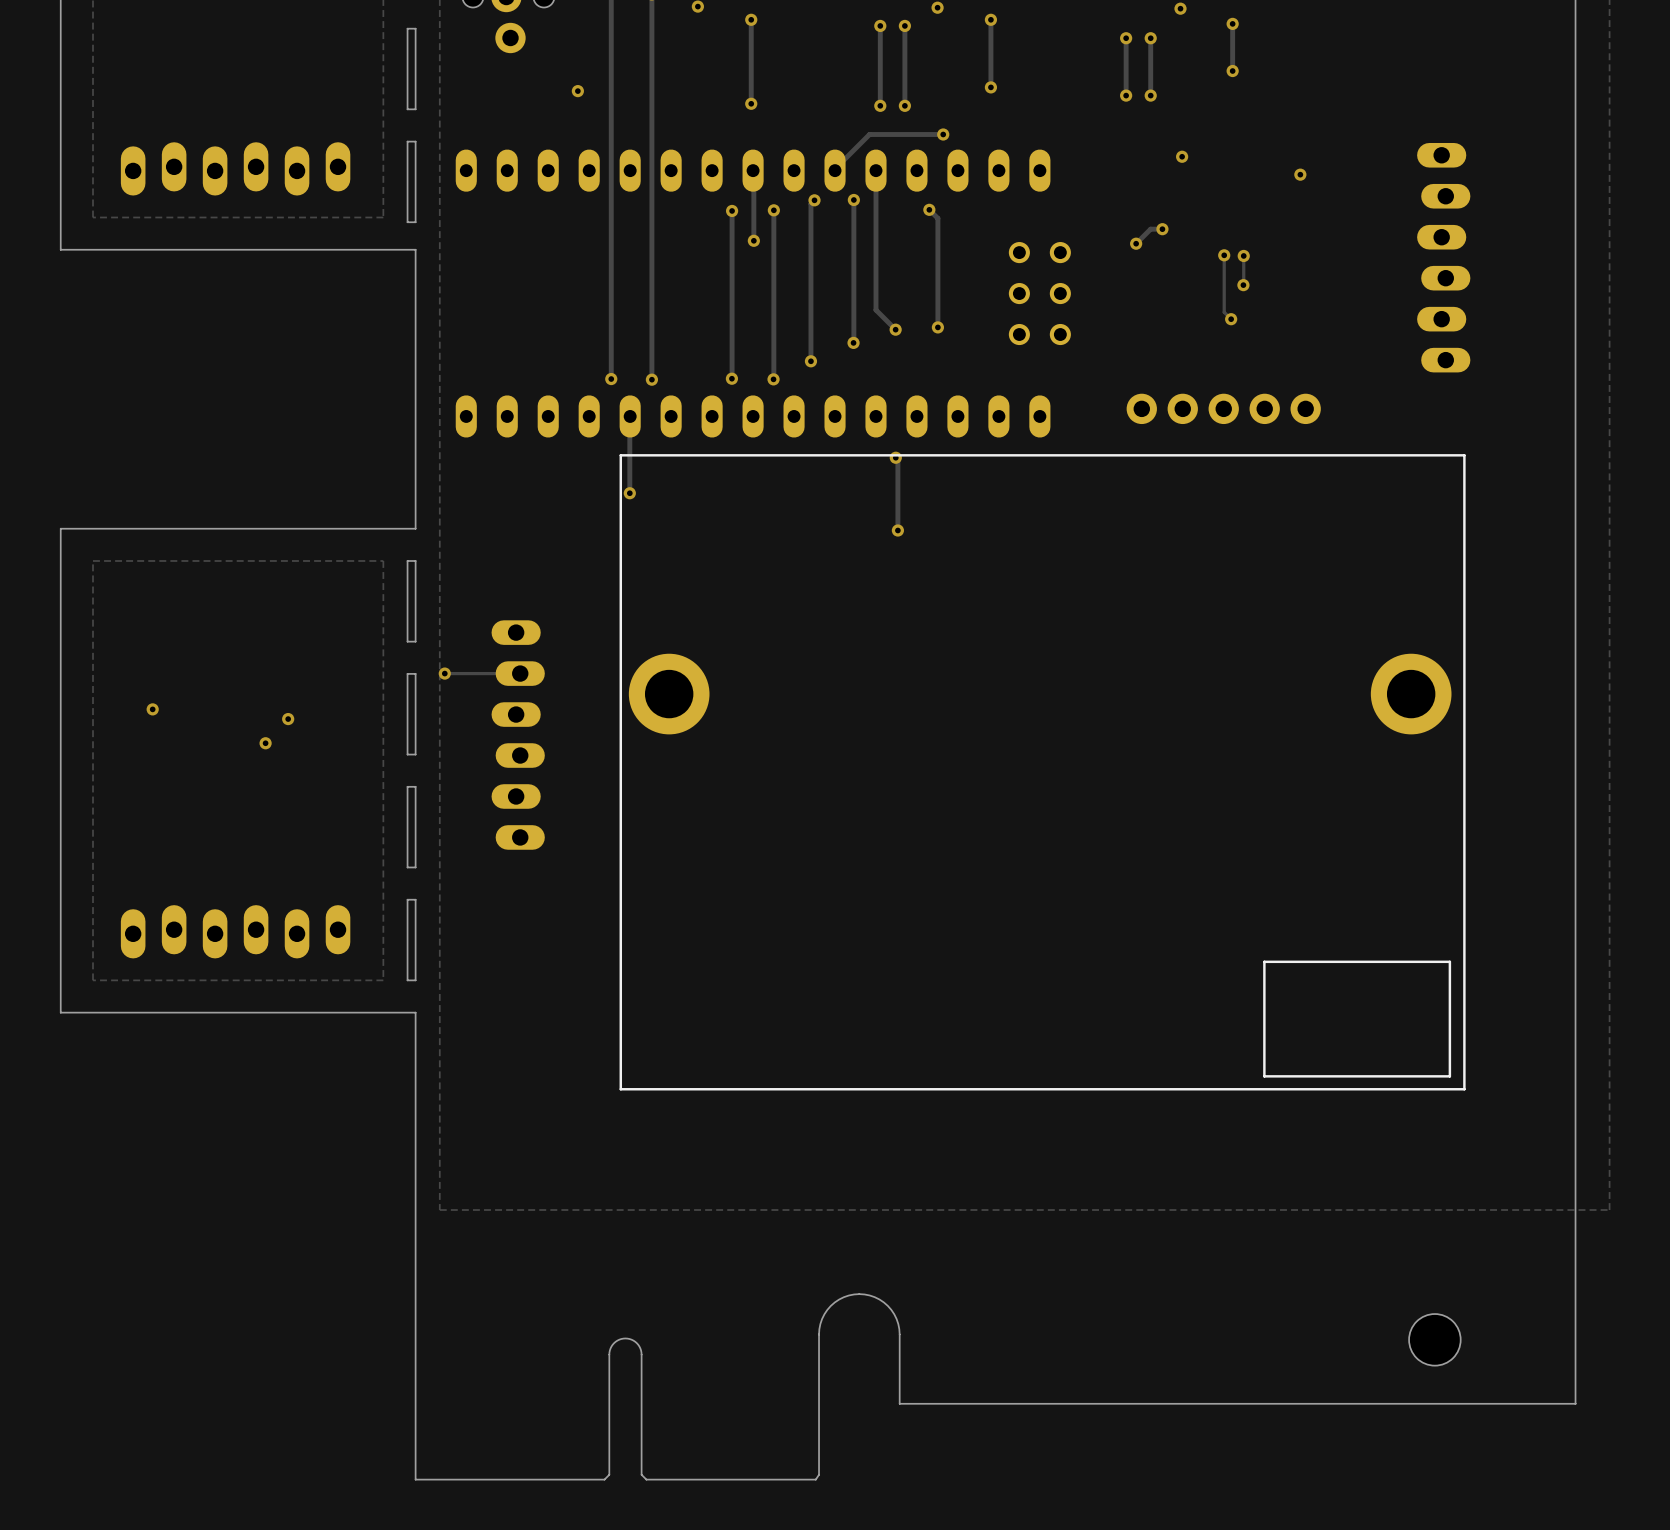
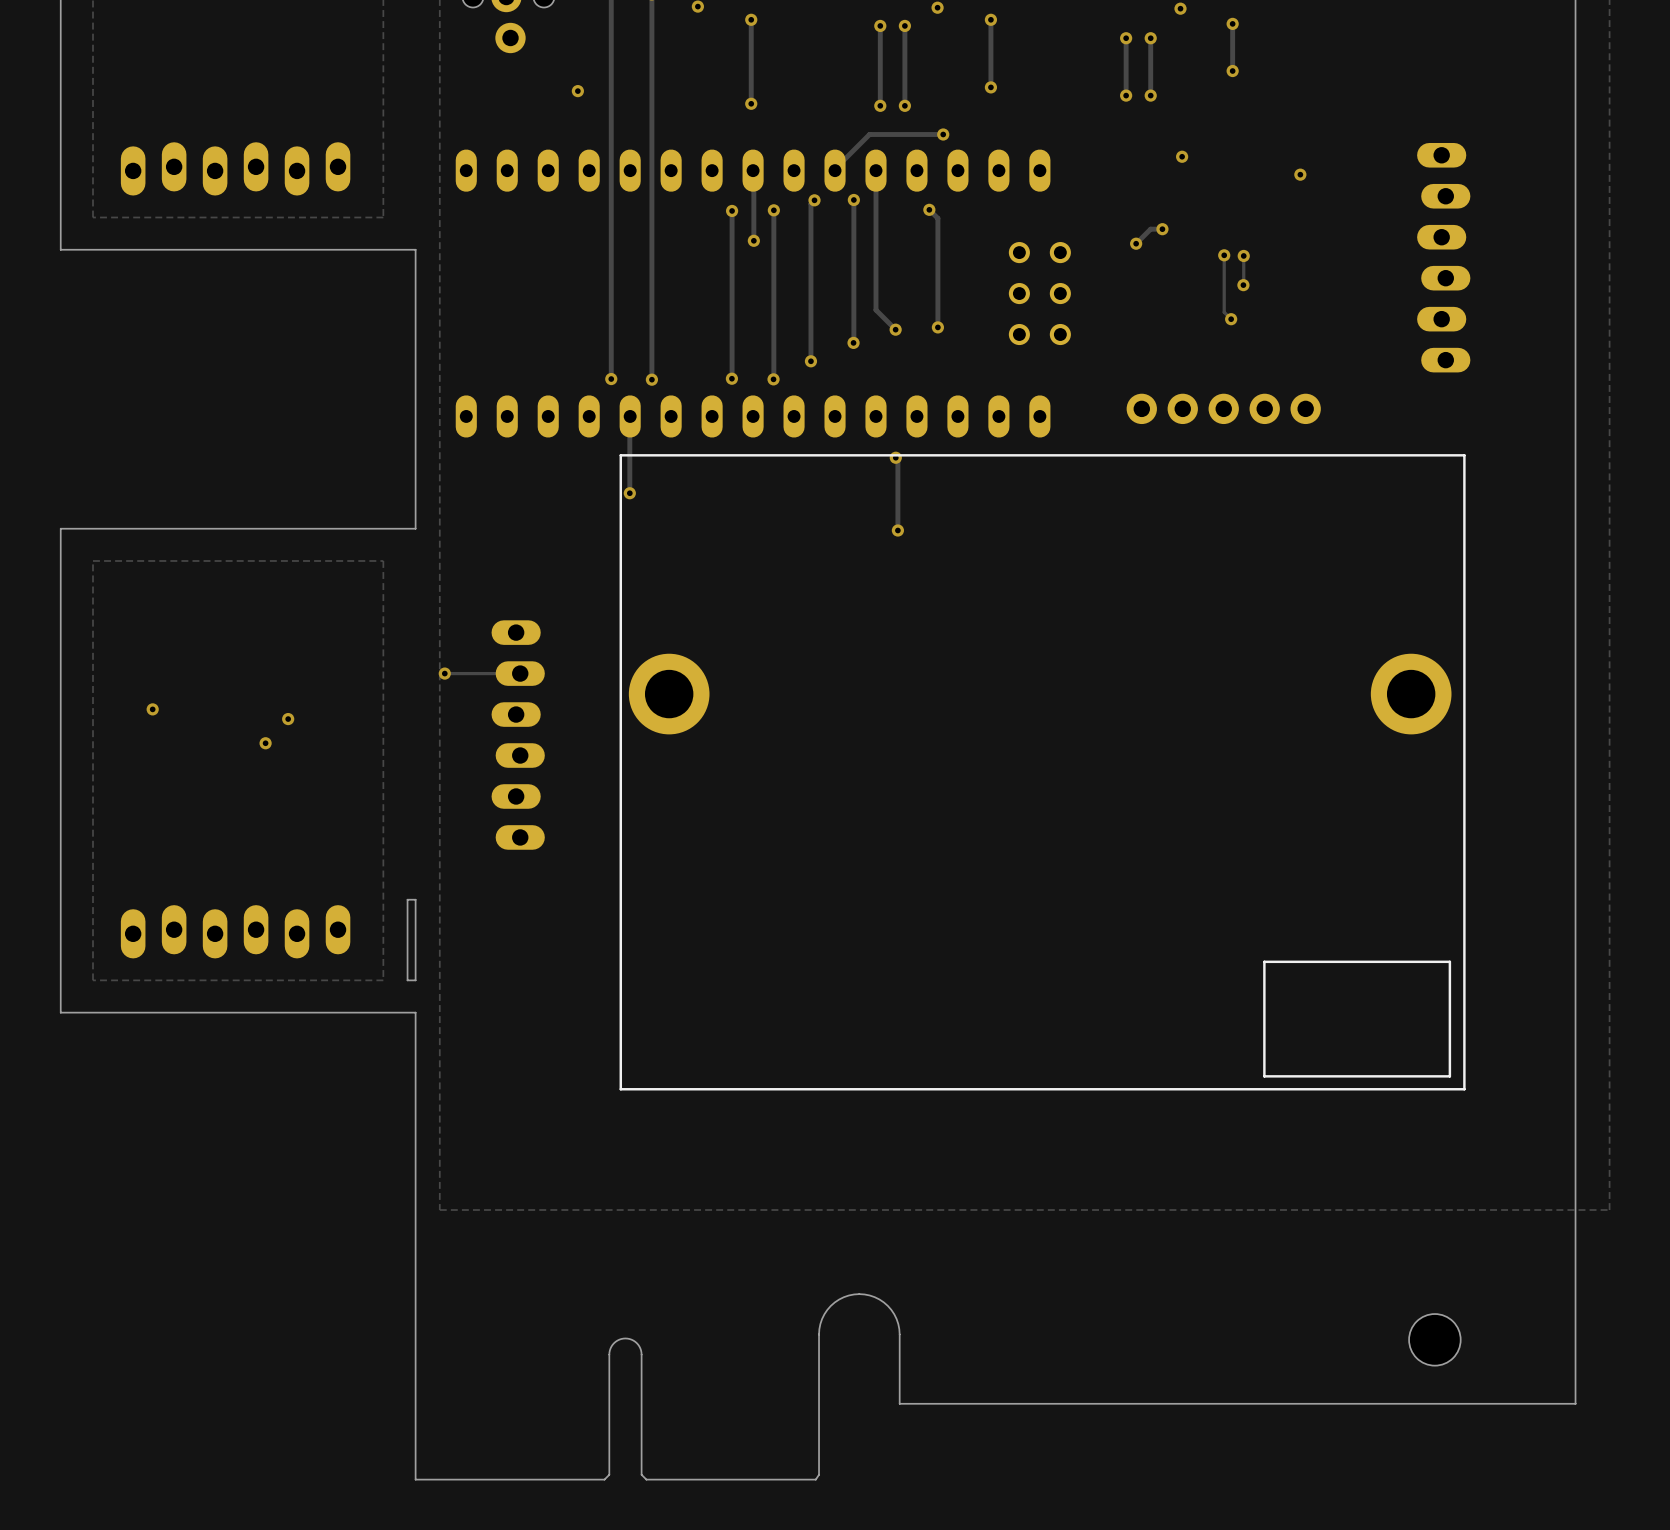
board edge: (415, 28) (415, 109) (407, 109) (407, 28) (415, 28) -> none
board edge: (415, 141) (415, 222) (407, 222) (407, 141) (415, 141) -> none
board edge: (415, 560) (415, 641) (407, 641) (407, 560) (415, 560) -> none
board edge: (415, 673) (415, 754) (407, 754) (407, 673) (415, 673) -> none
board edge: (415, 786) (415, 867) (407, 867) (407, 786) (415, 786) -> none

